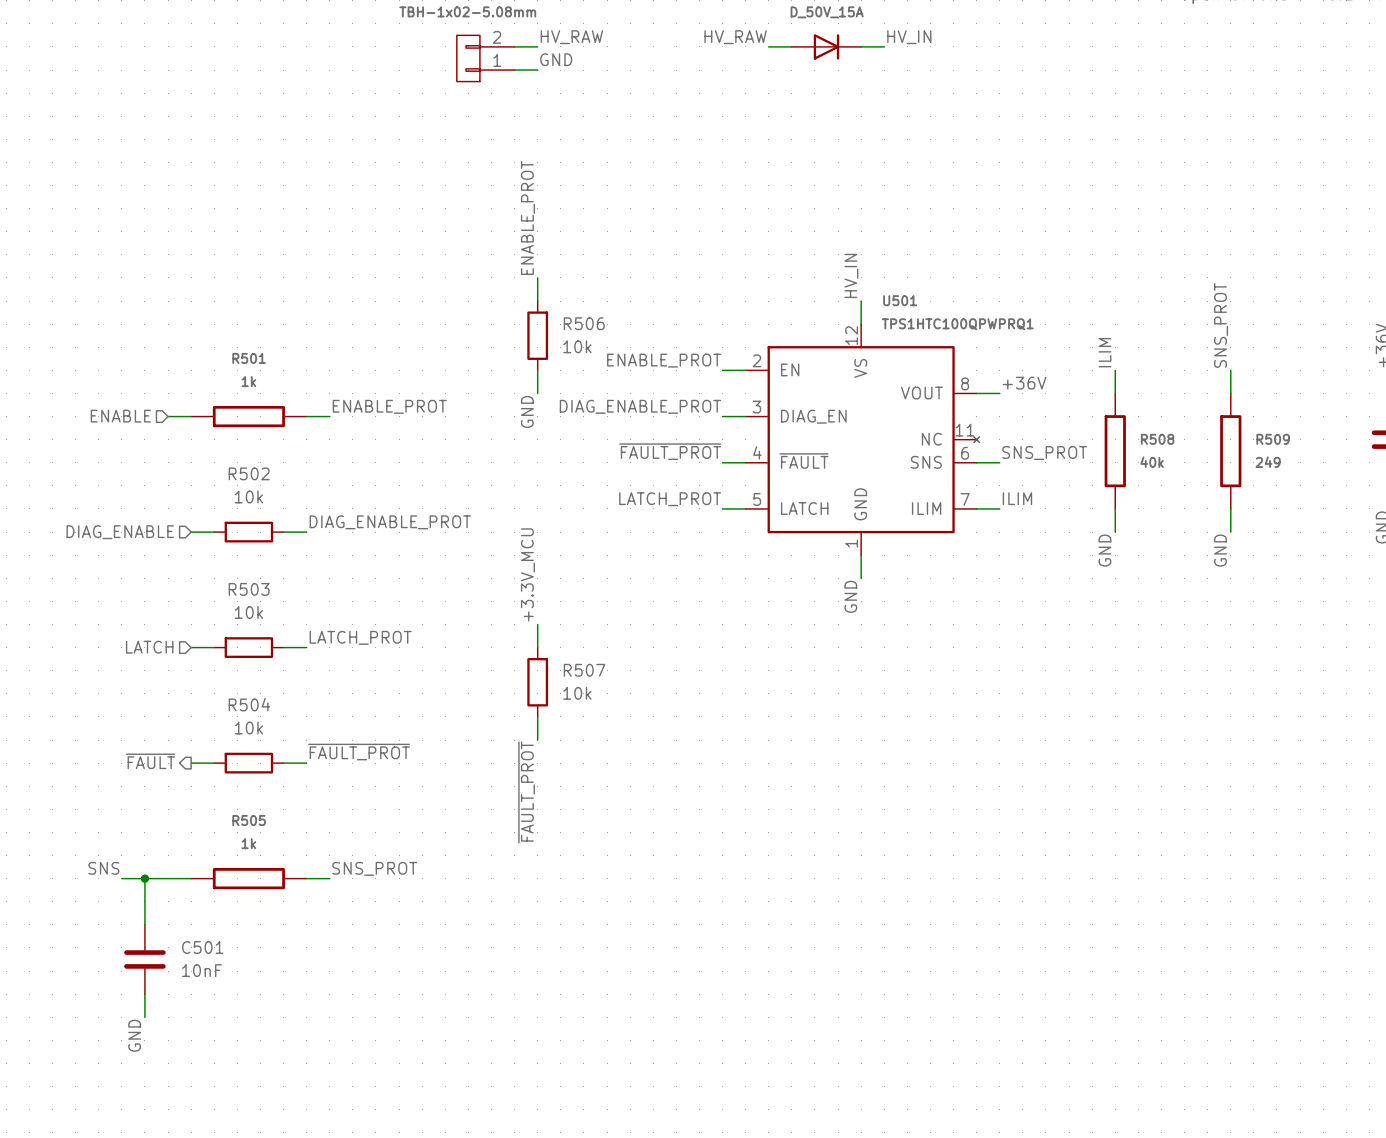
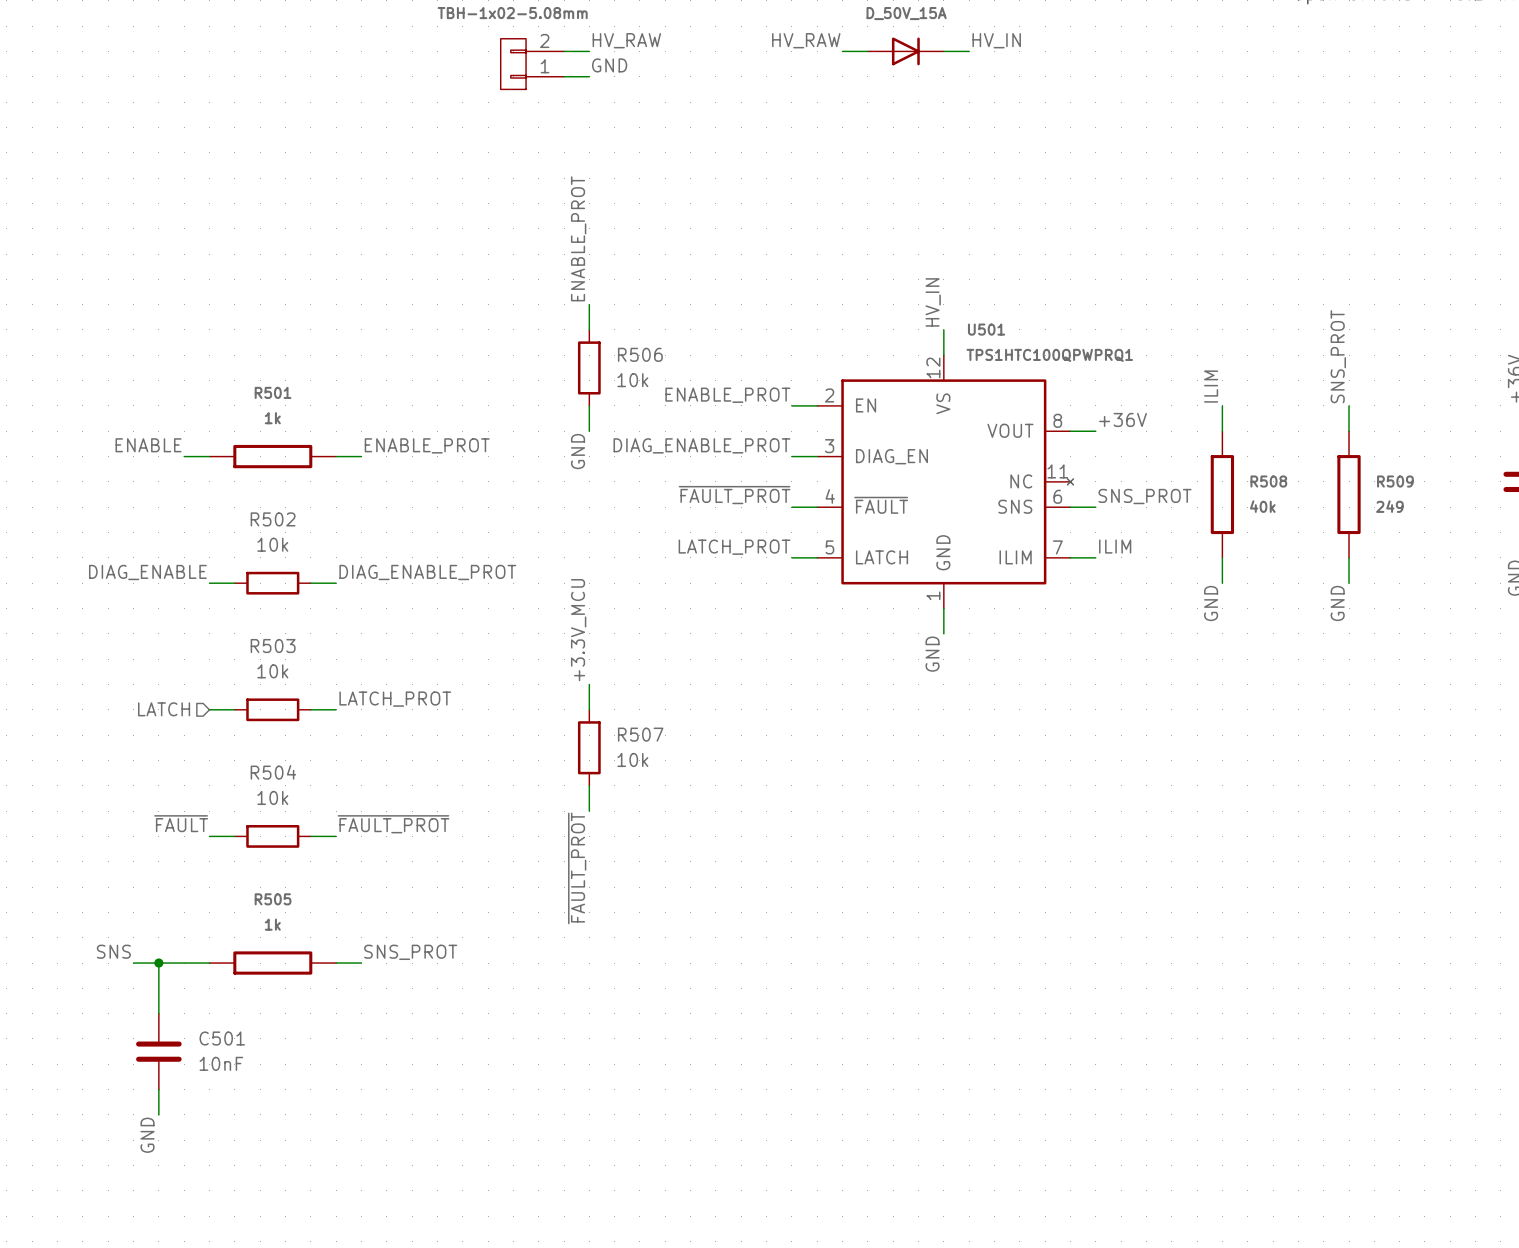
label: none -> ENABLE (148, 445)
hierarchical label: ENABLE (120, 416) -> none
label: none -> DIAG_ENABLE (147, 572)
hierarchical label: DIAG_ENABLE (120, 532) -> none
label: none -> ~{FAULT} (181, 823)
hierarchical label: ~{FAULT} (150, 761) -> none

